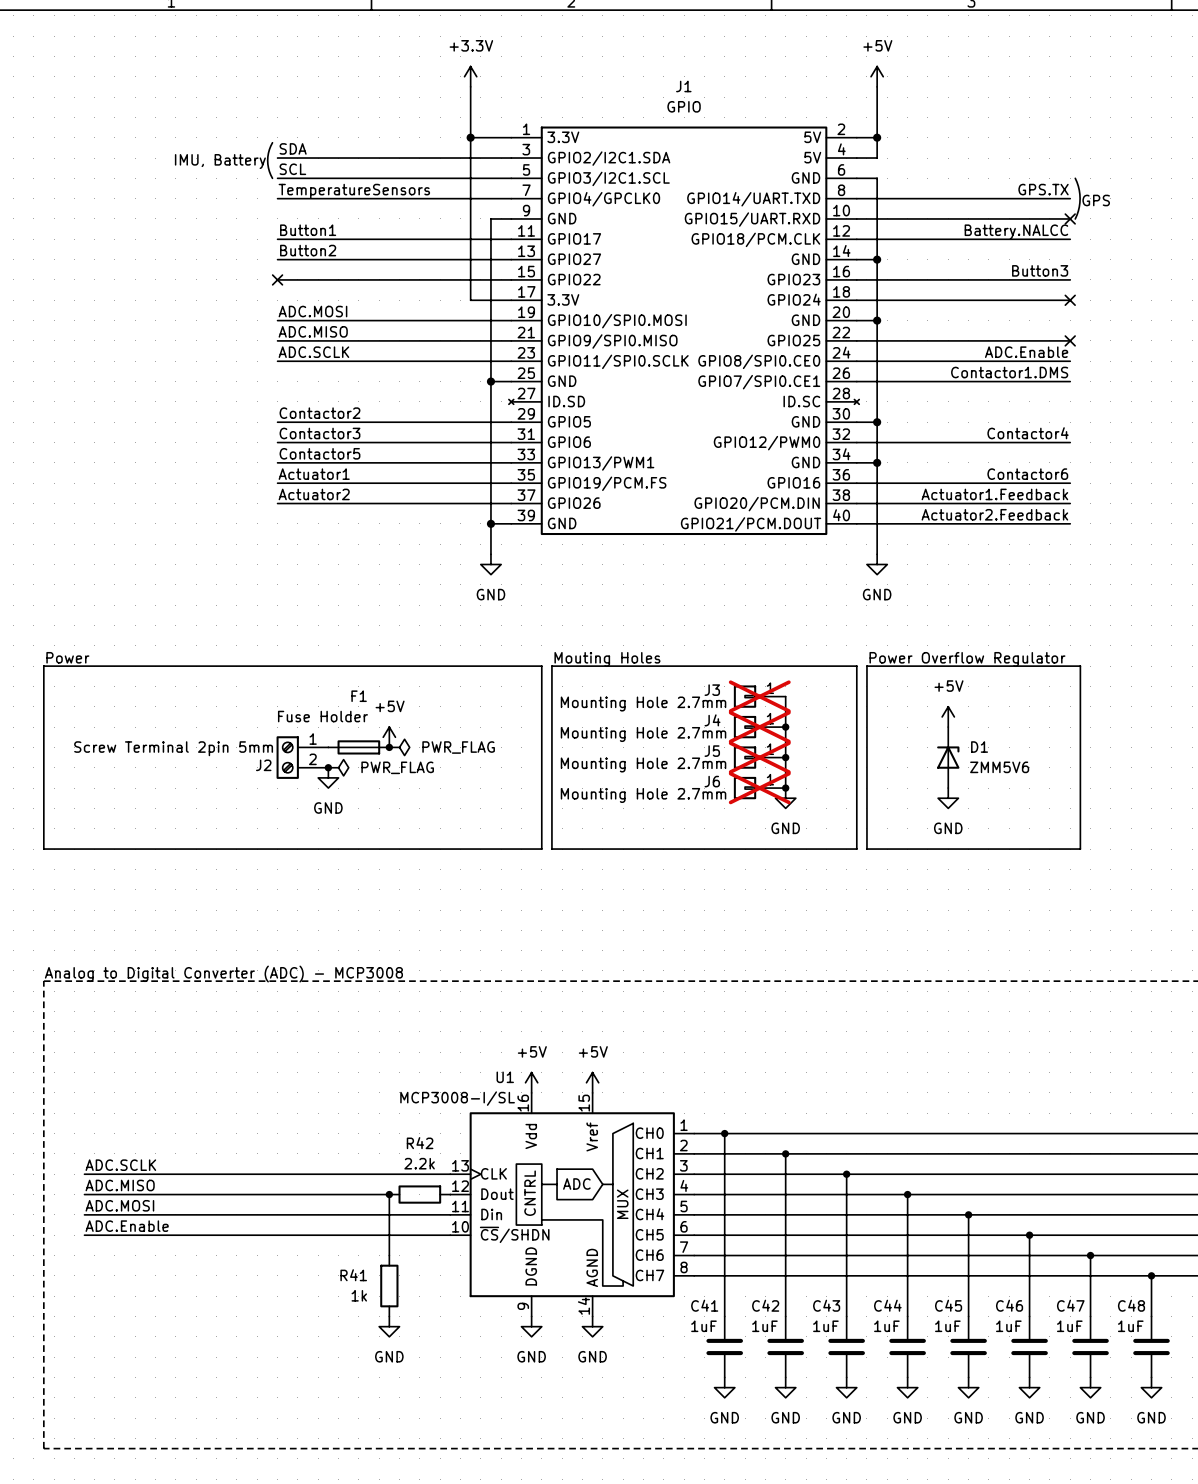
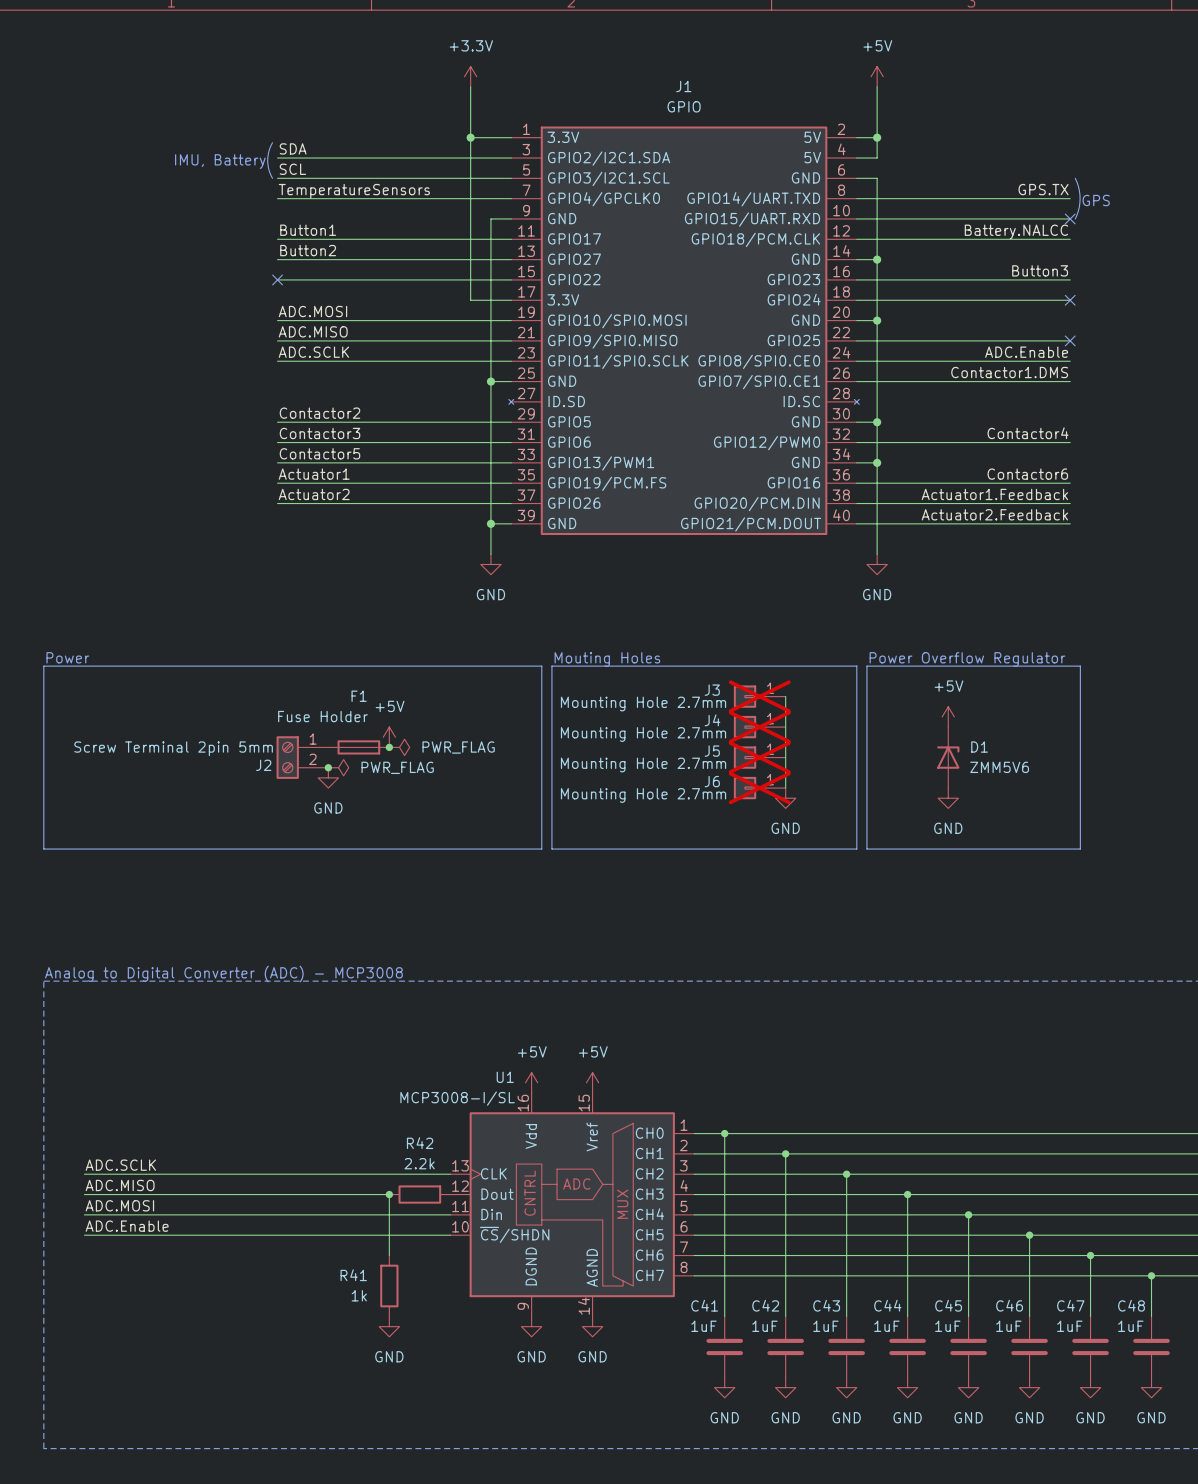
junction: (785, 727) -> none
junction: (785, 757) -> none
junction: (785, 788) -> none

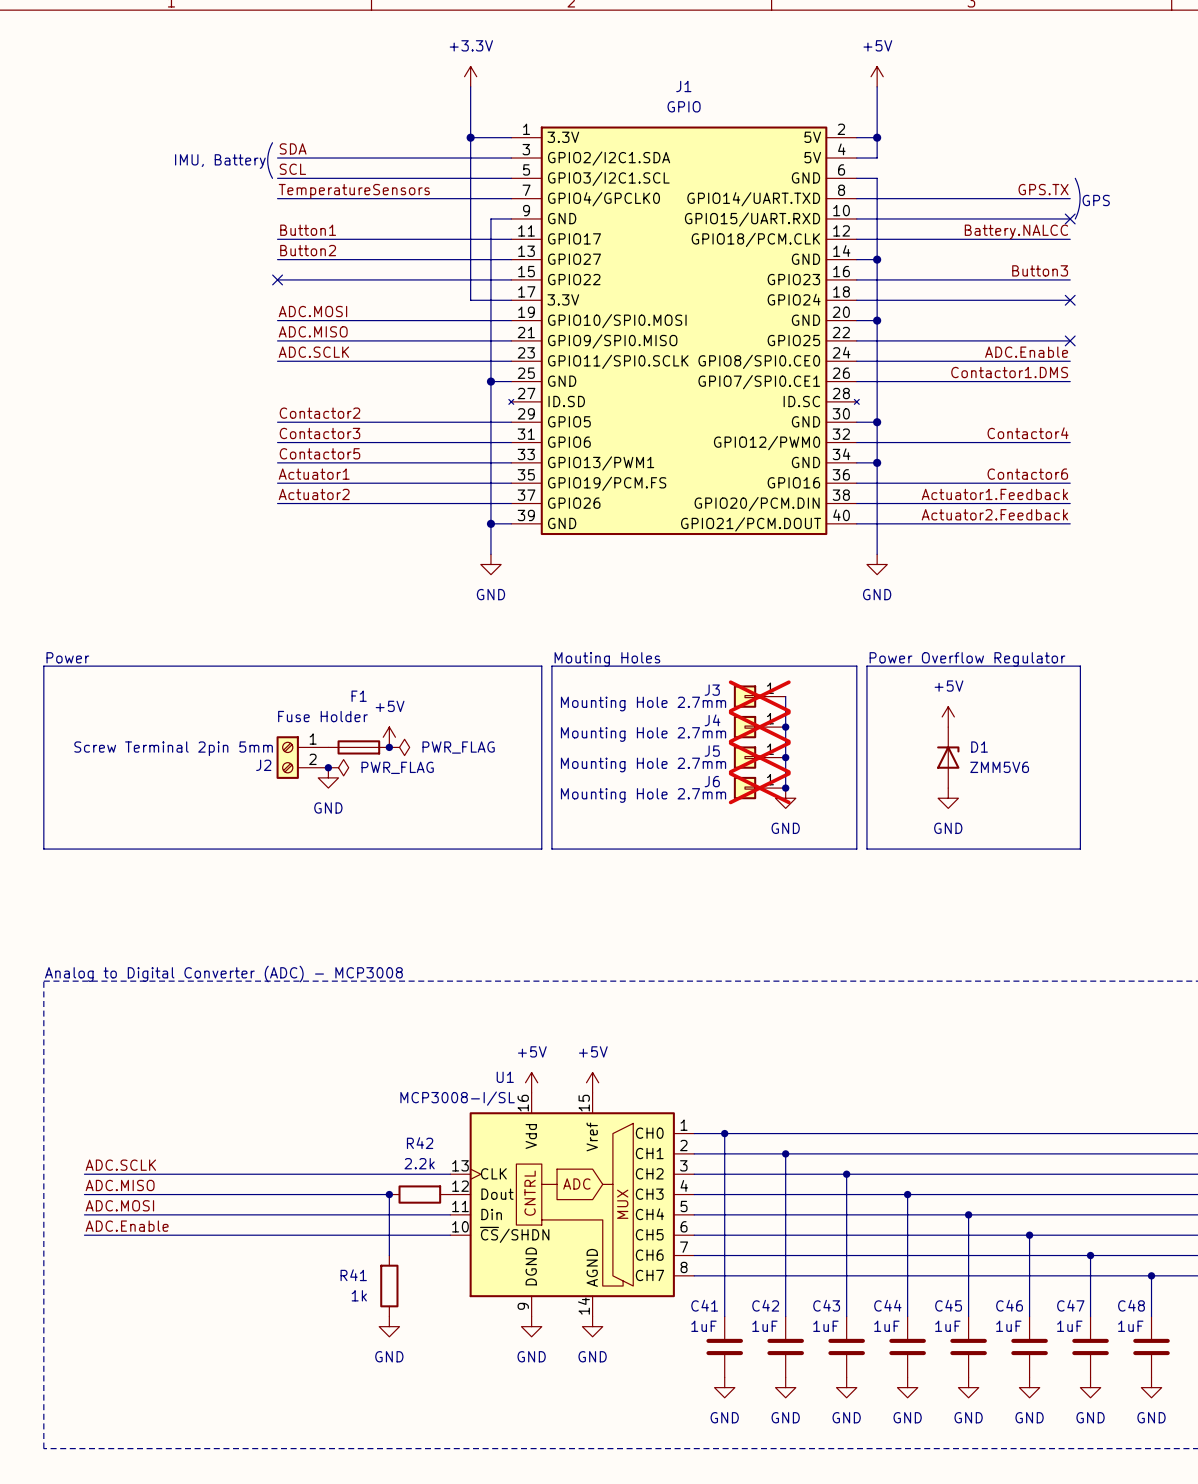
junction: none -> (785, 727)
junction: none -> (785, 757)
junction: none -> (785, 788)

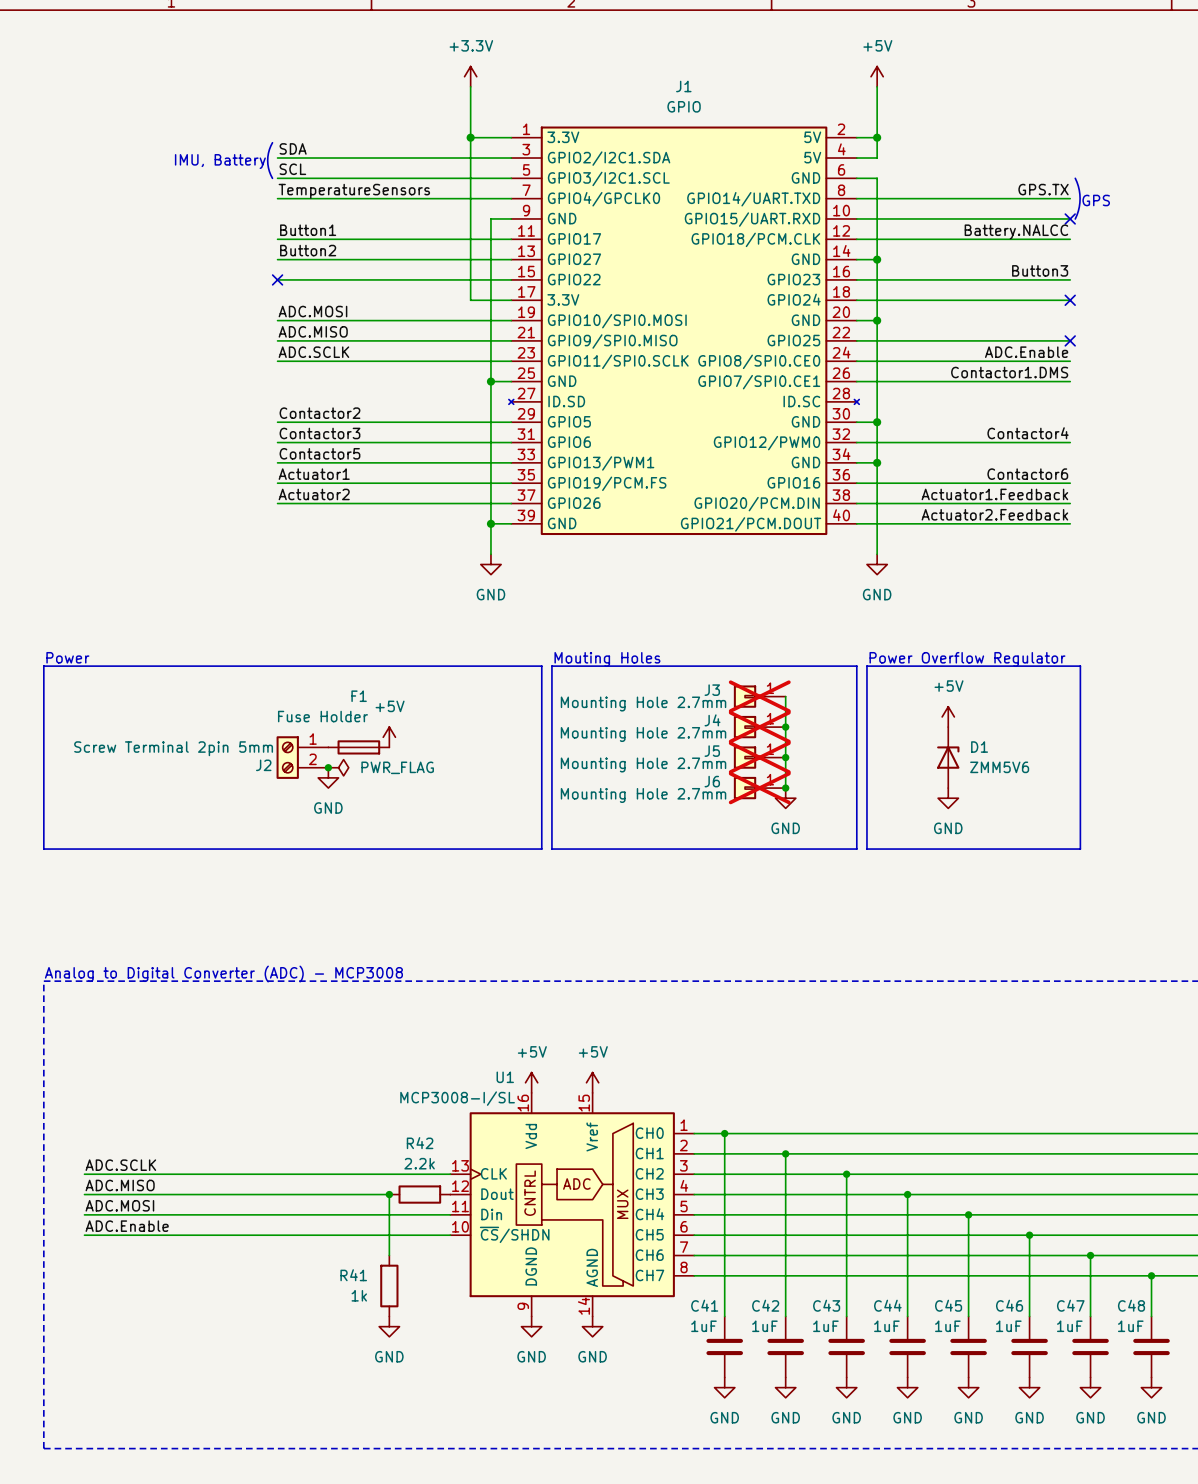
junction: (389, 747) -> none
power symbol: PWR_FLAG (399, 747) -> none

